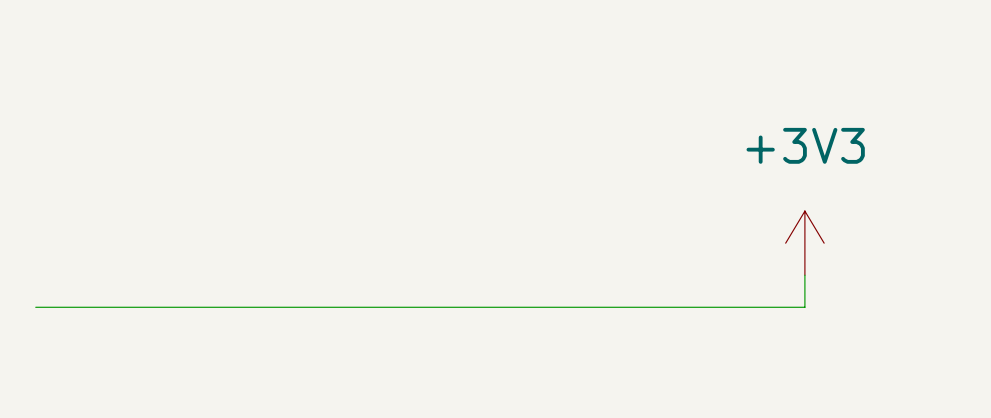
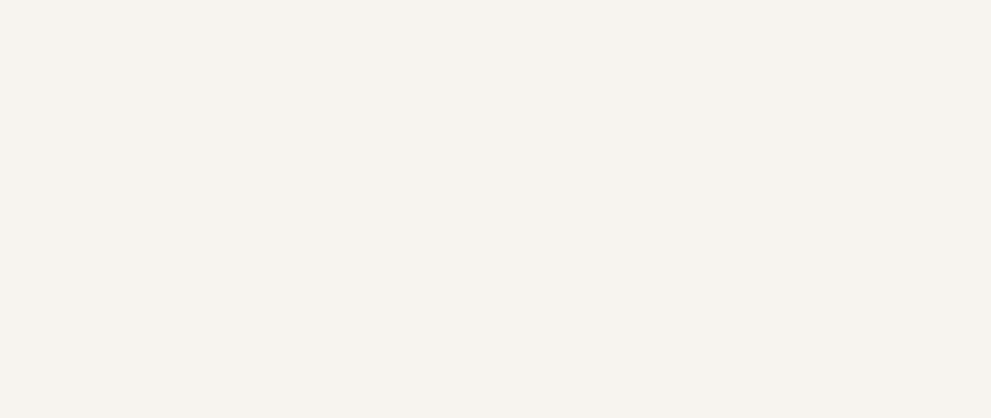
power symbol: +3V3 (804, 243) -> none
wire: (804, 275) (804, 307) (35, 307) -> none

